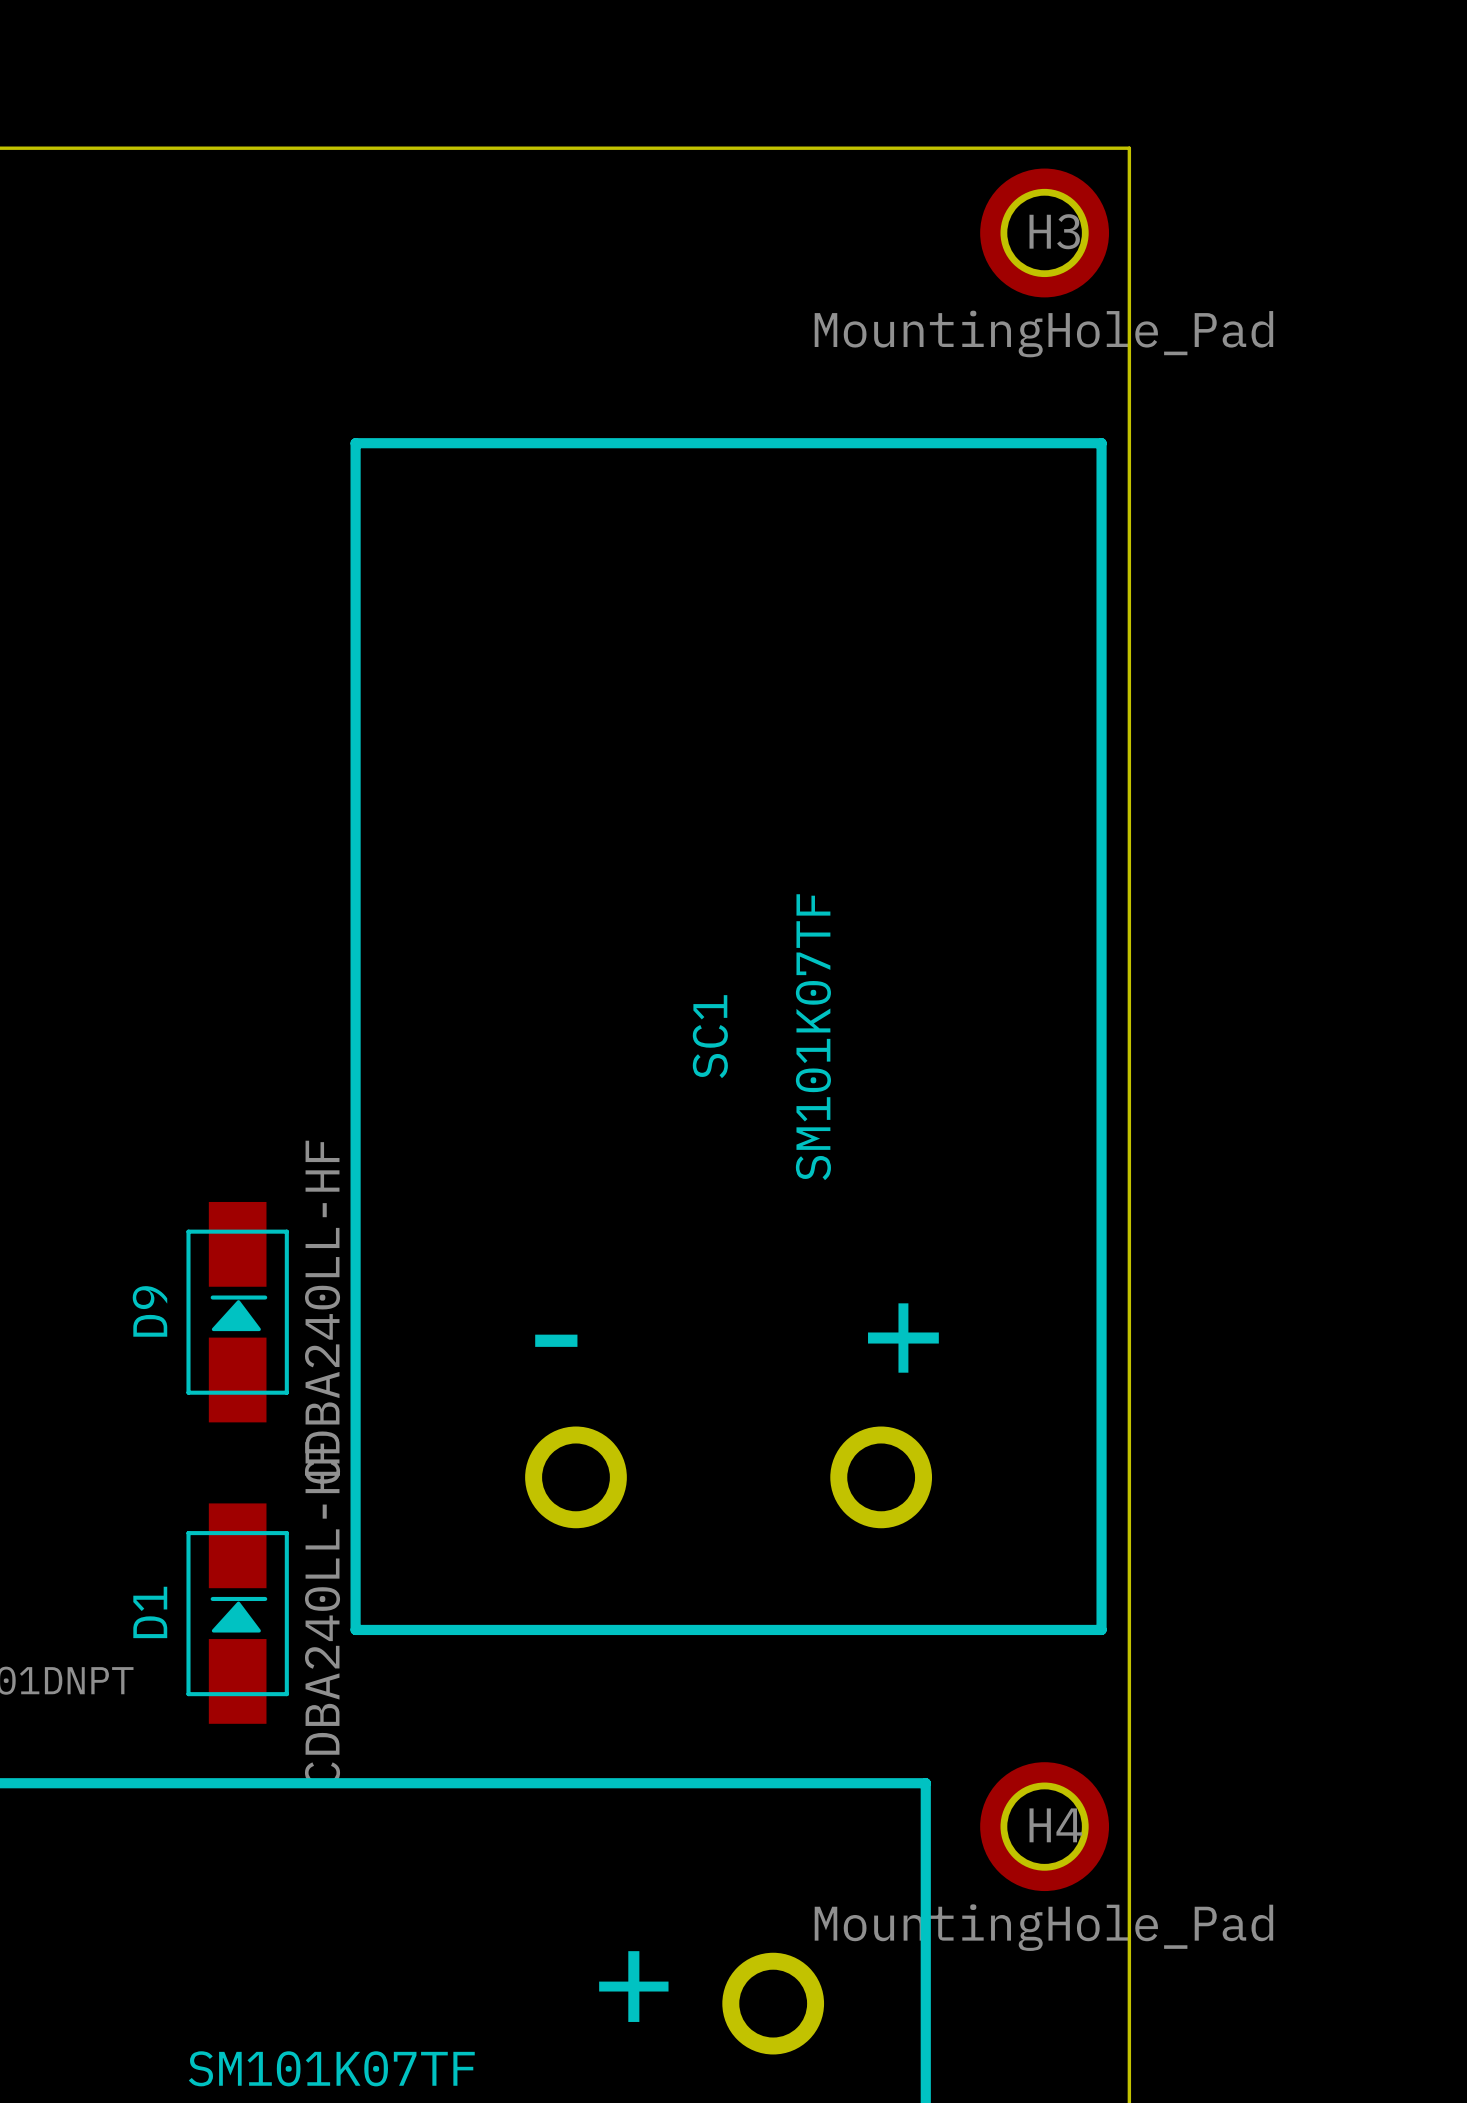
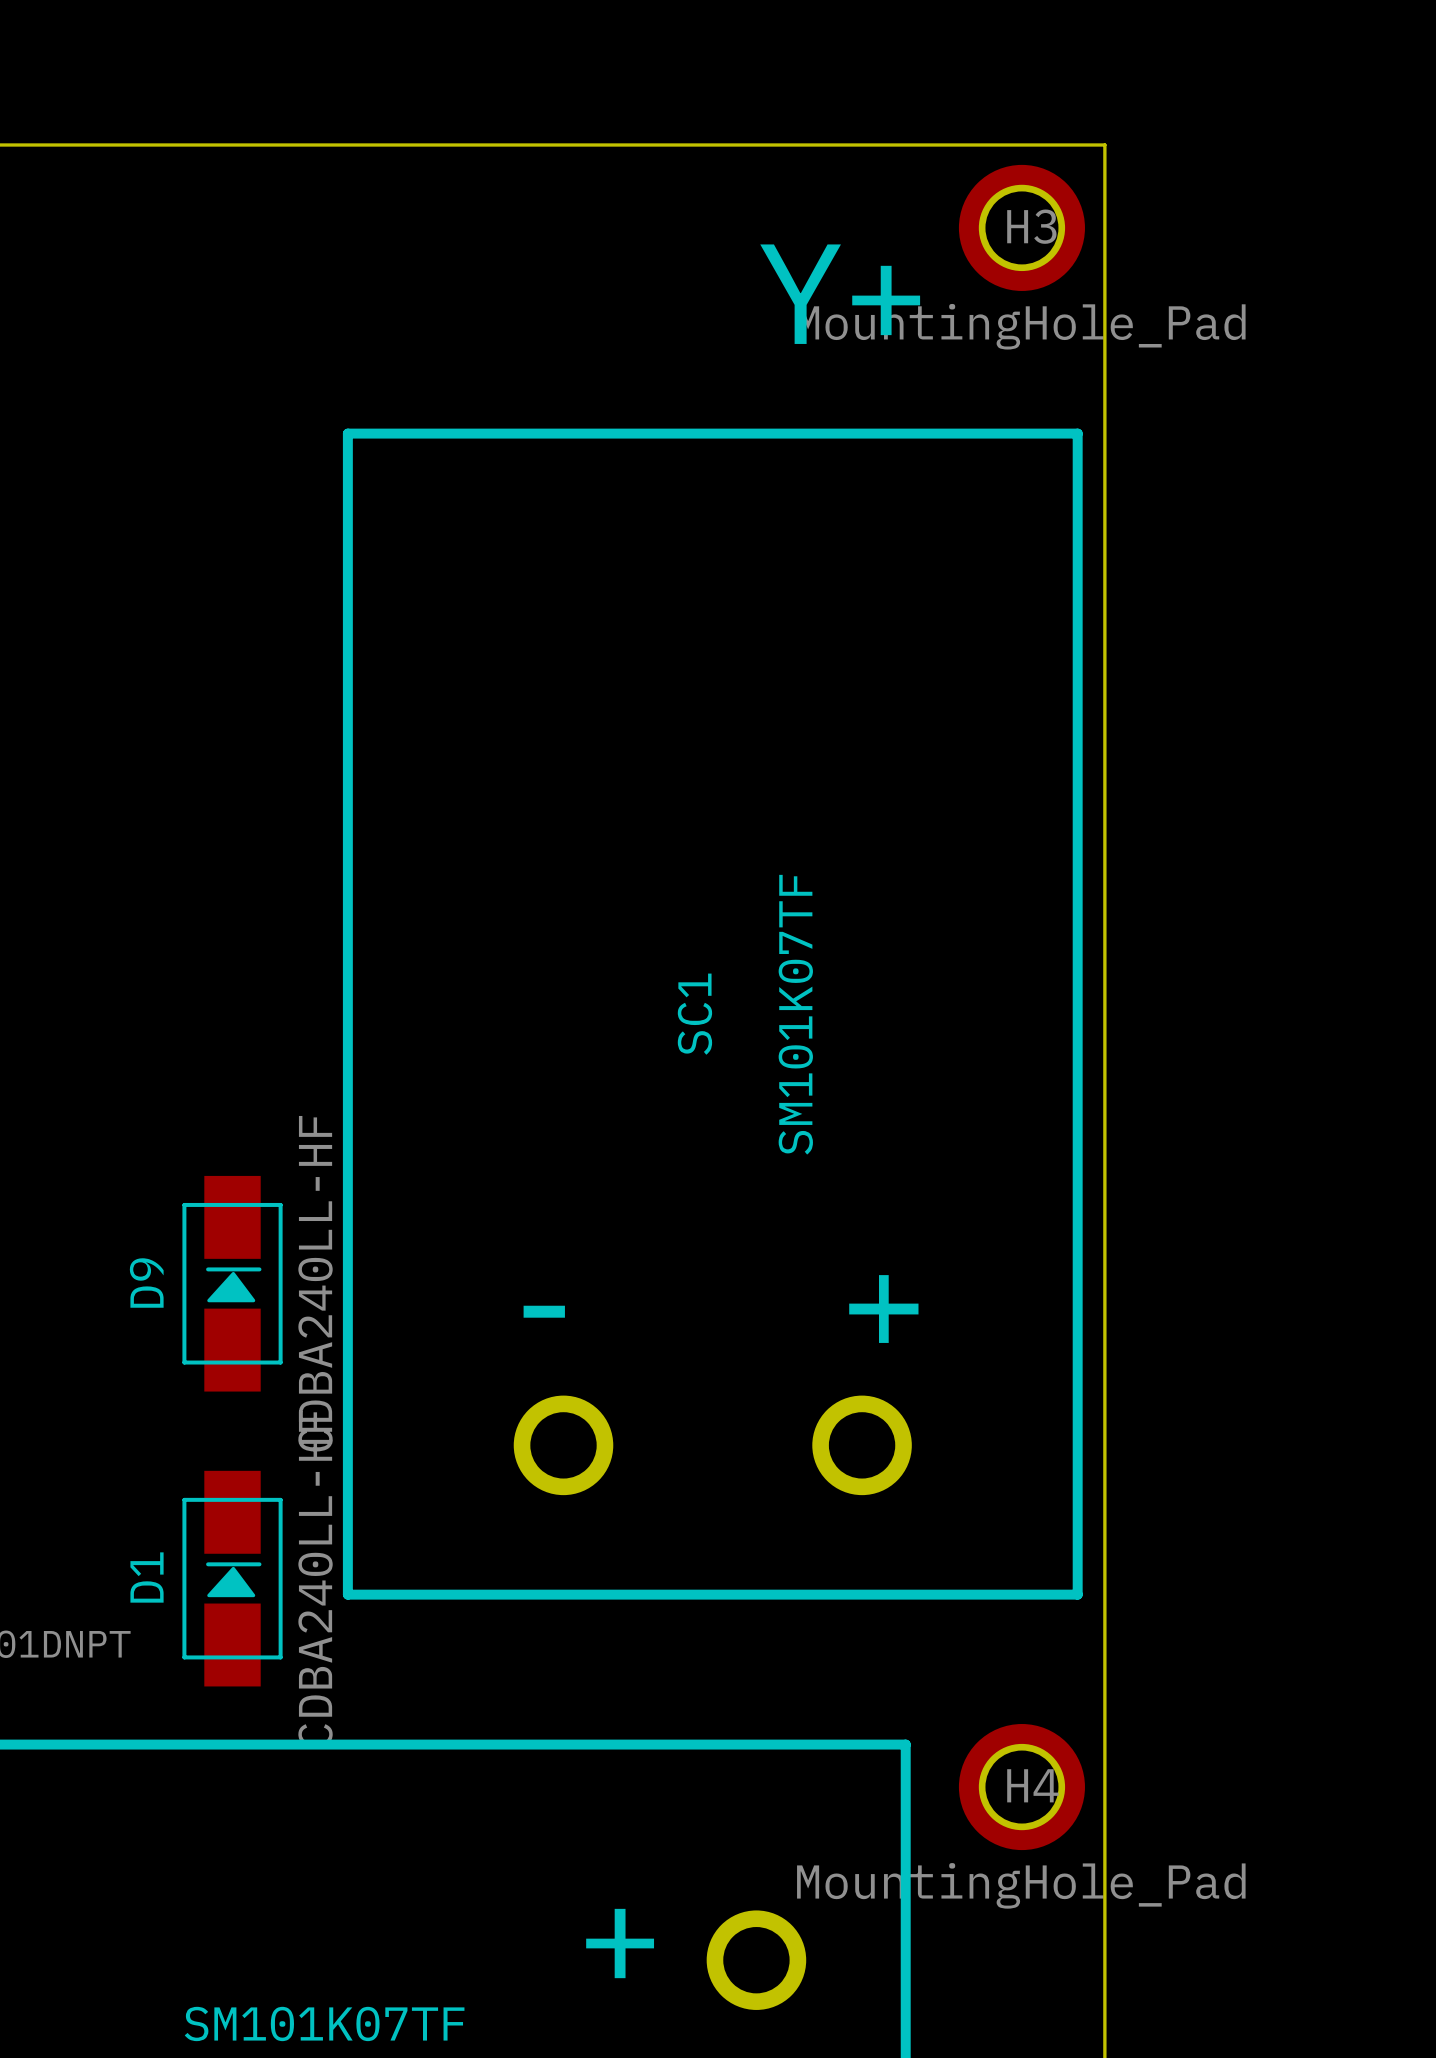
text: none -> Y+ (840, 294)

